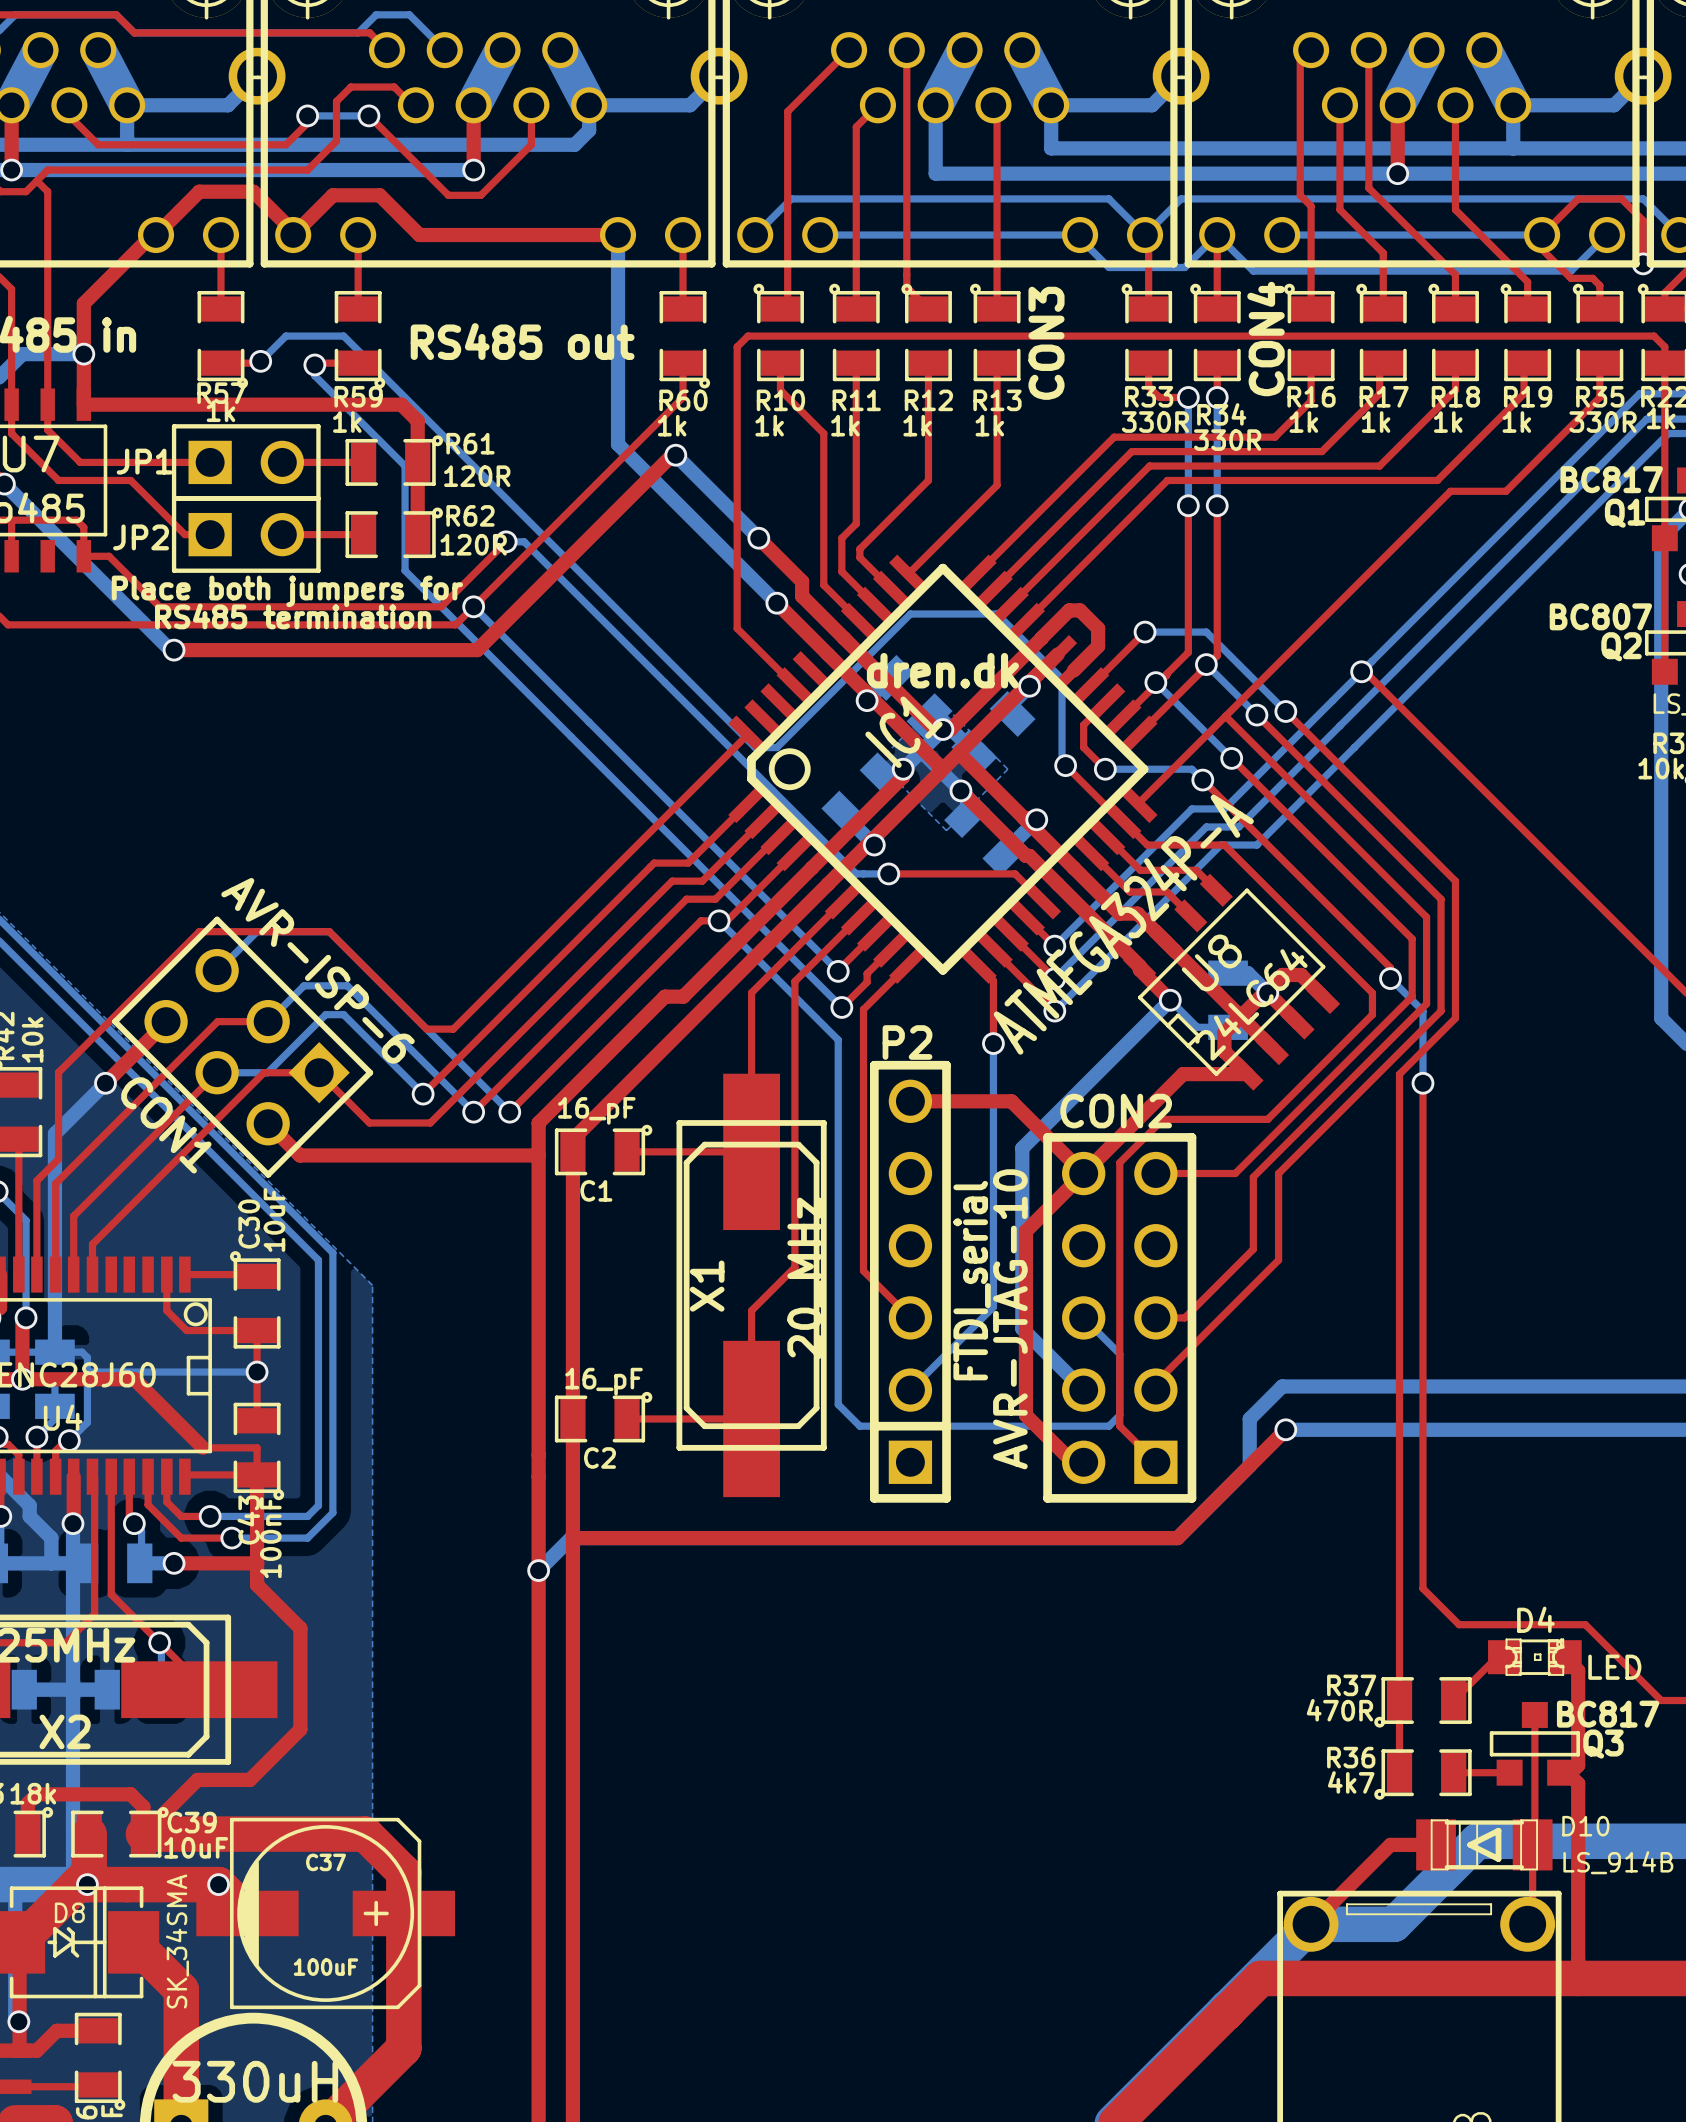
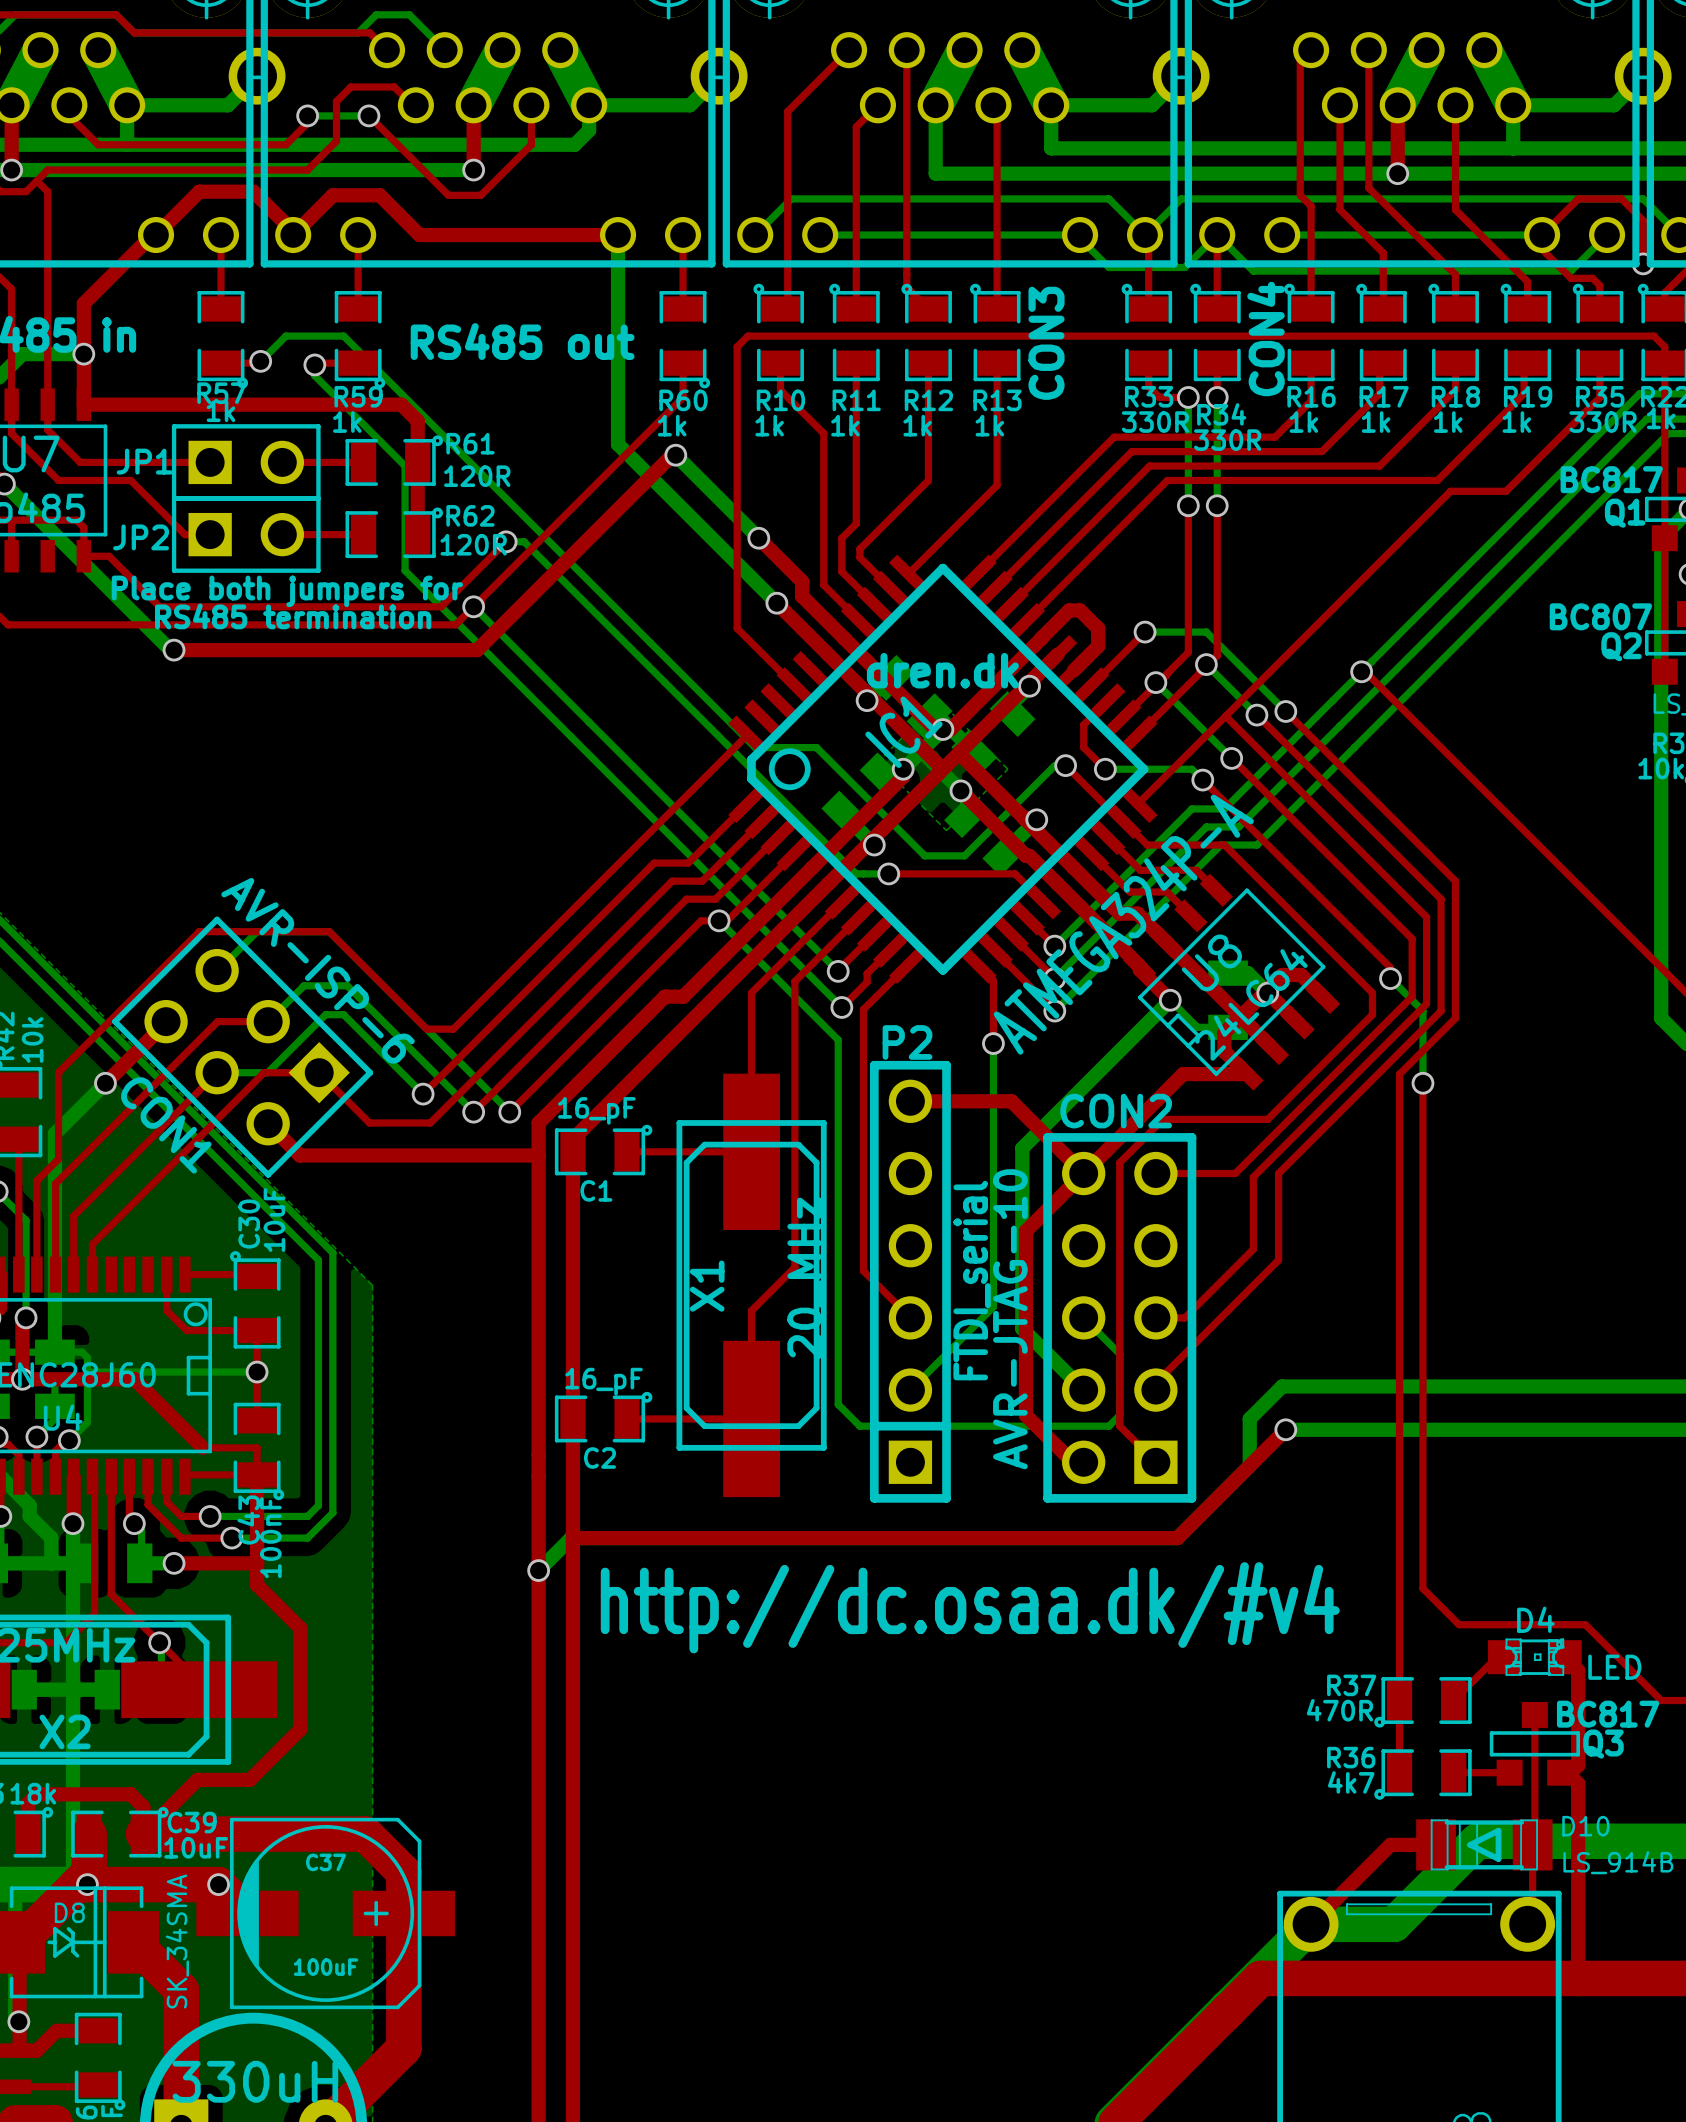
bottom track: (776, 747) (910, 614) (997, 614) (1062, 679) (1062, 762) -> (776, 747) (816, 747) (924, 855) (964, 855) (1054, 765) (1065, 765)
text: none -> http://dc.osaa.dk/#v4 (970, 1607)

